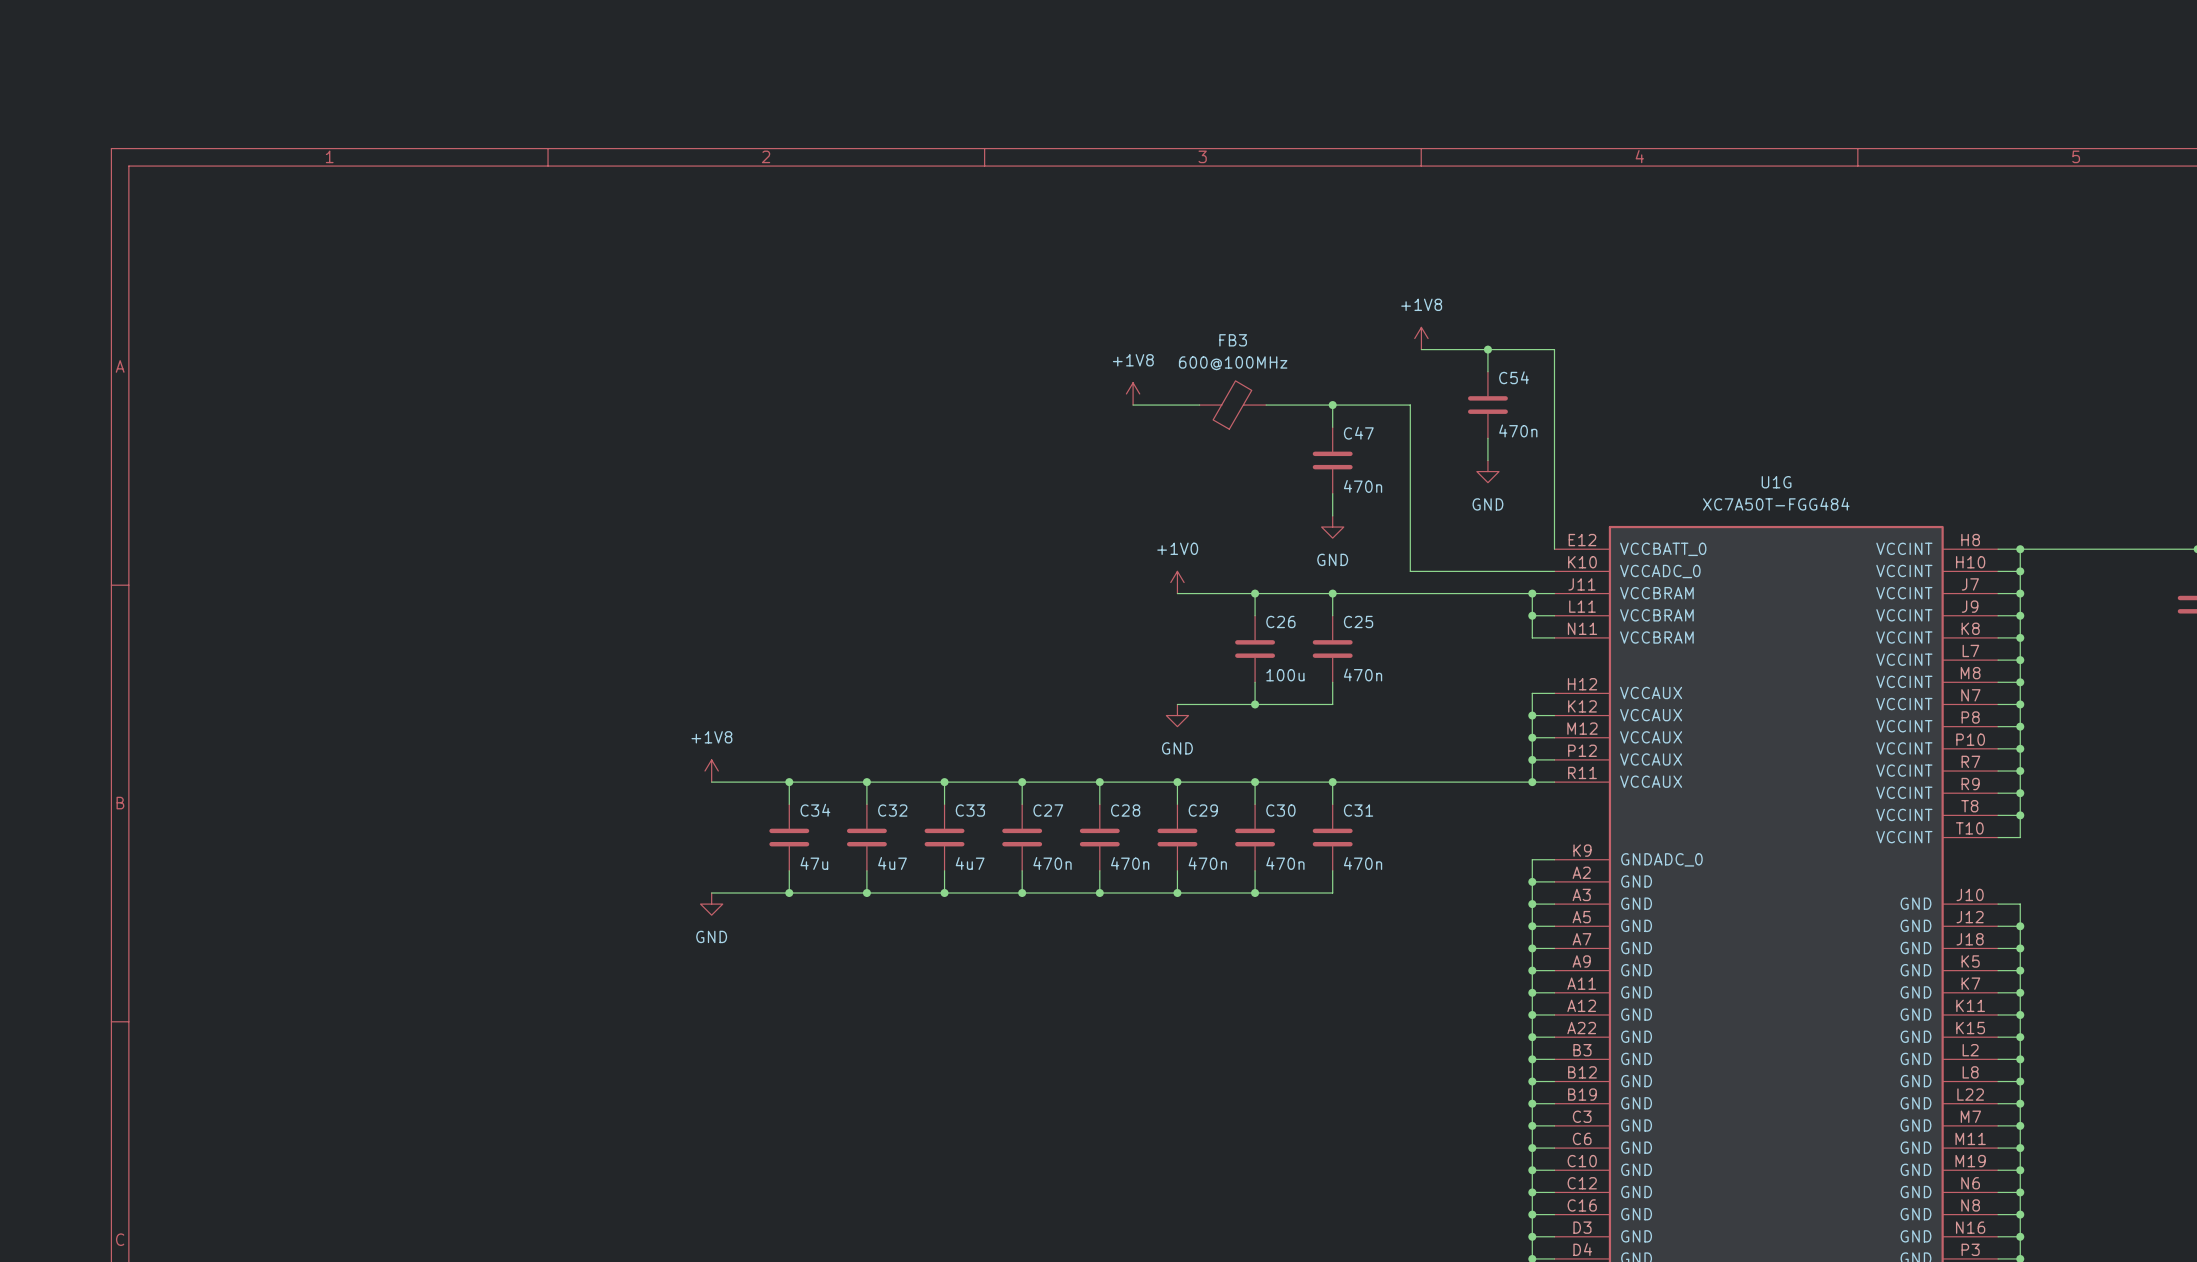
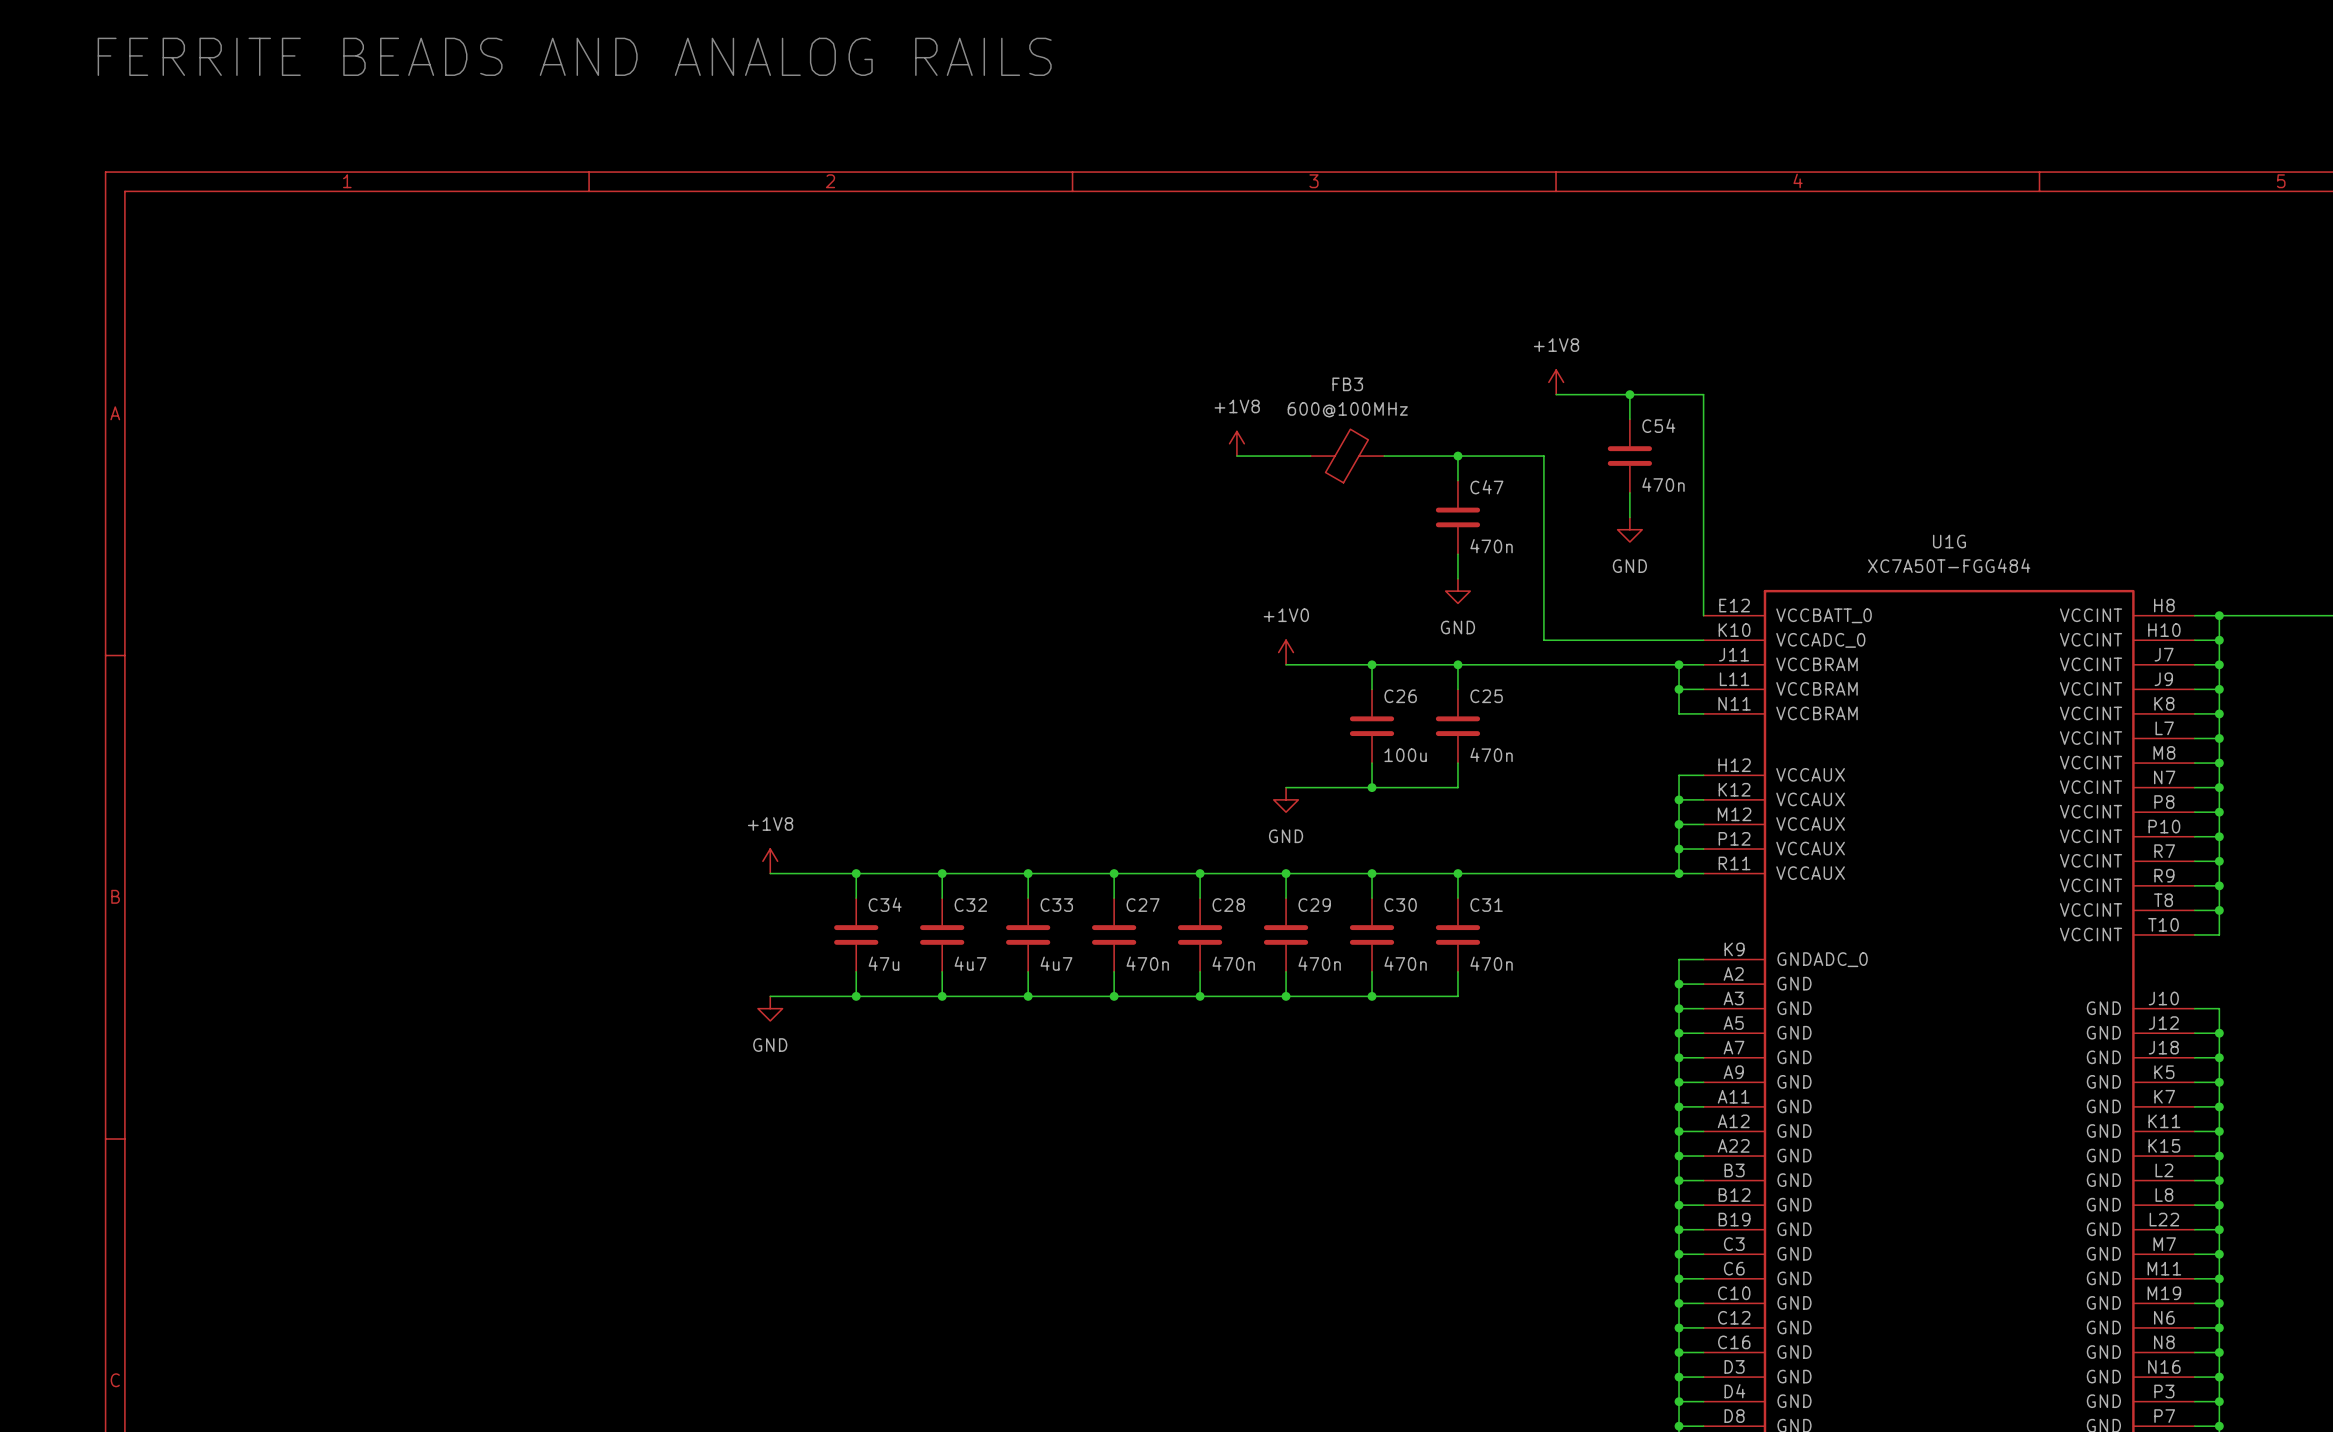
text: none -> FERRITE BEADS AND ANALOG RAILS (574, 56)

